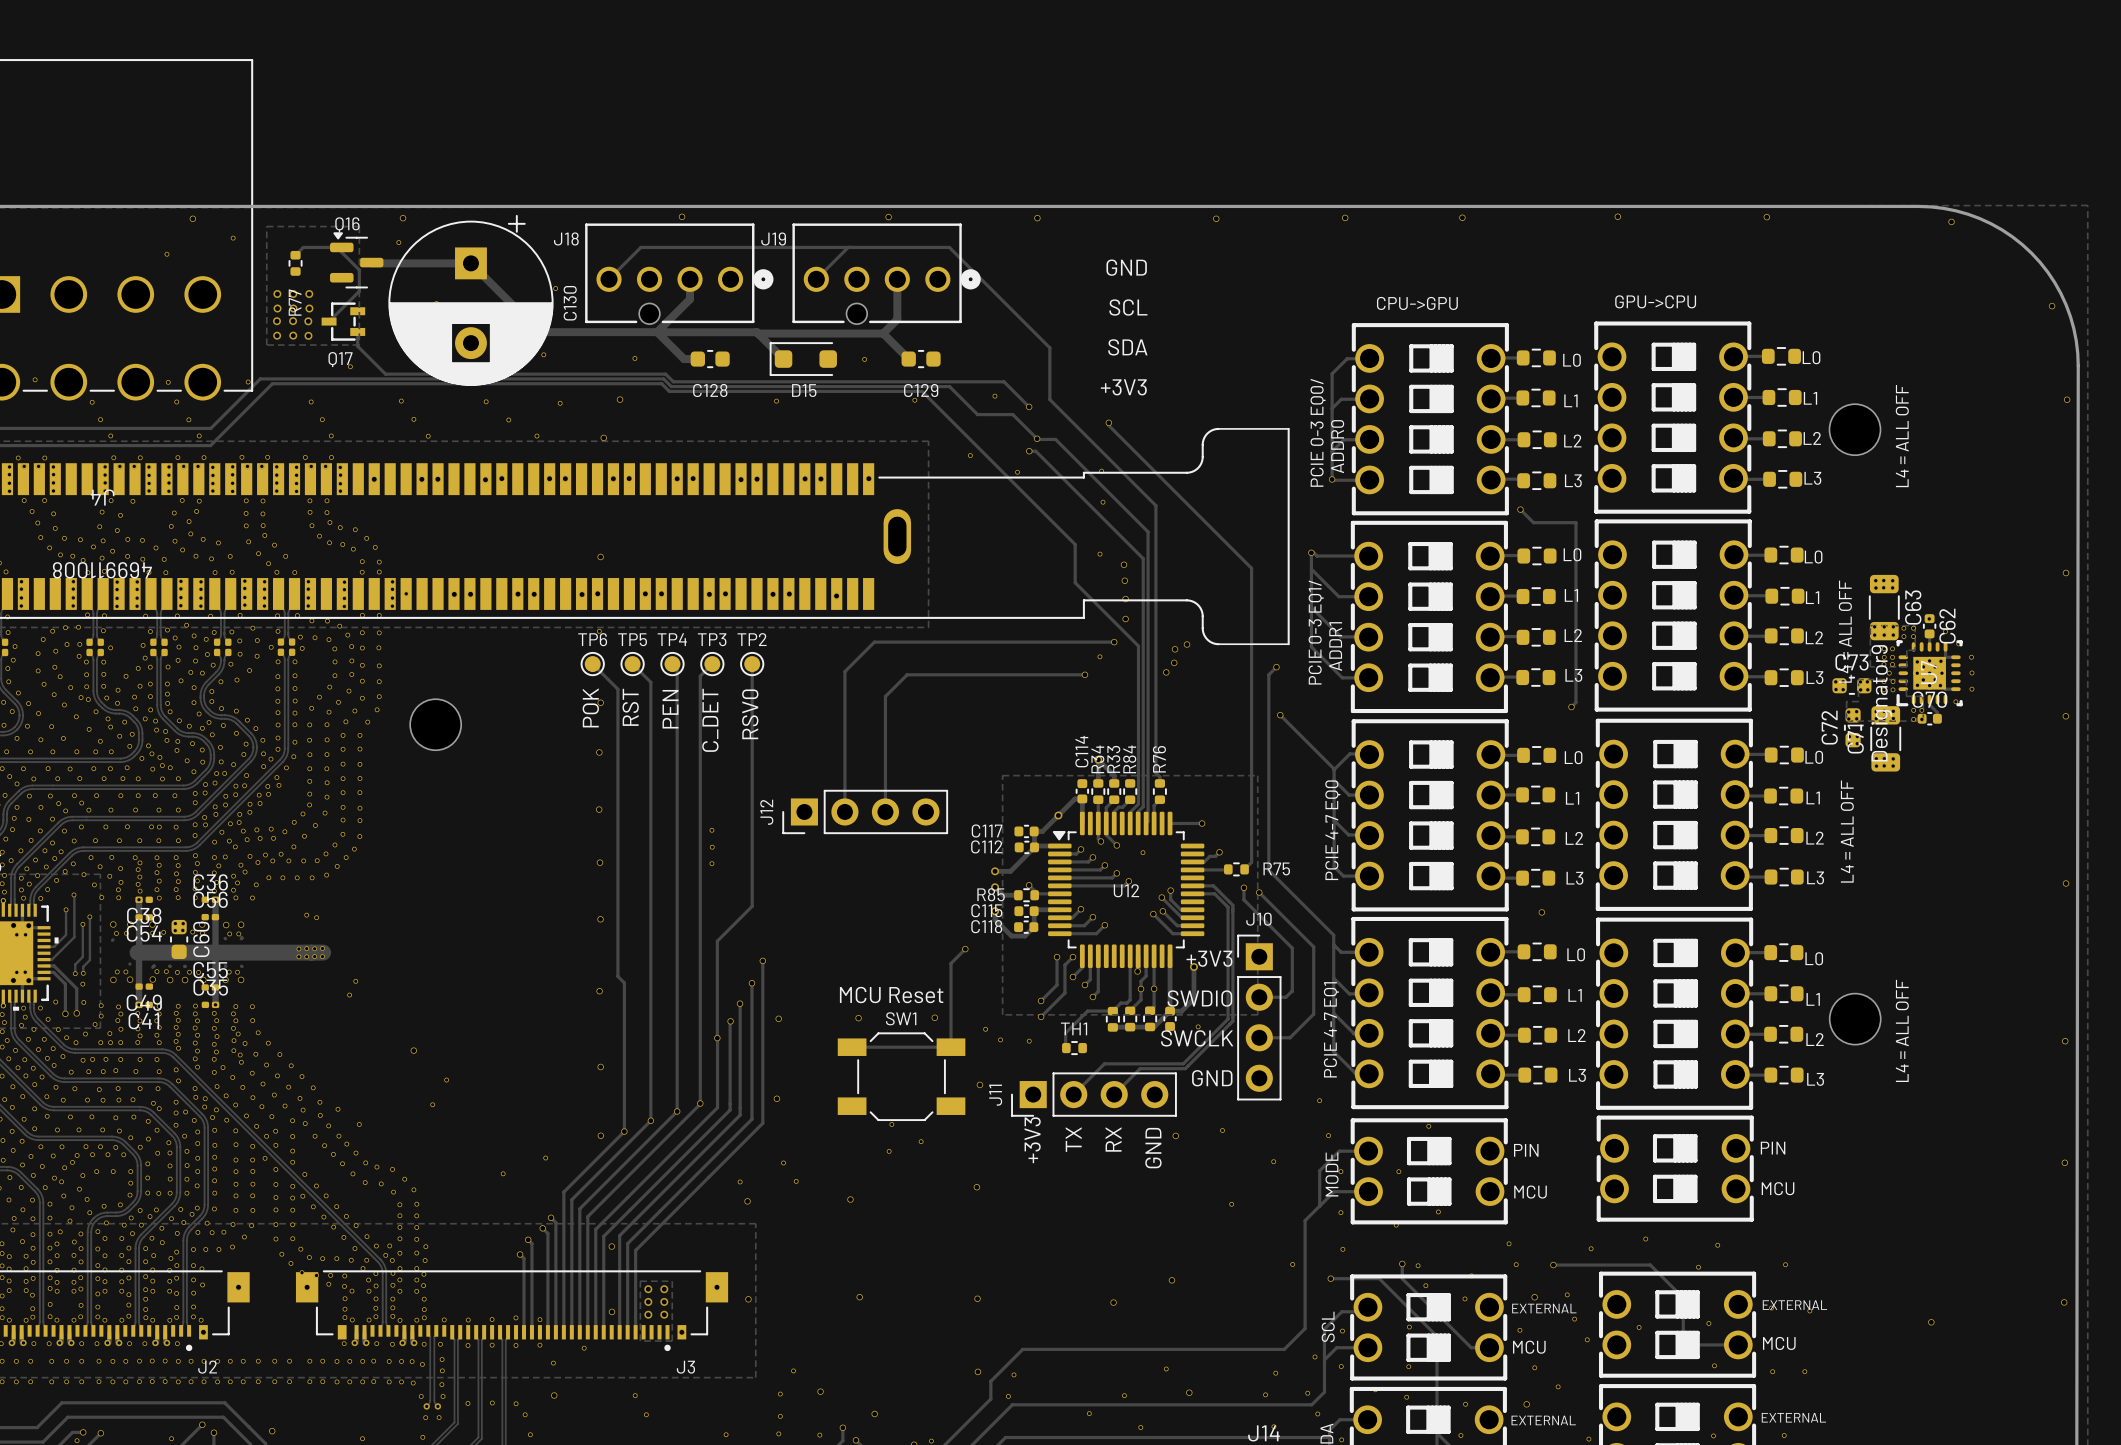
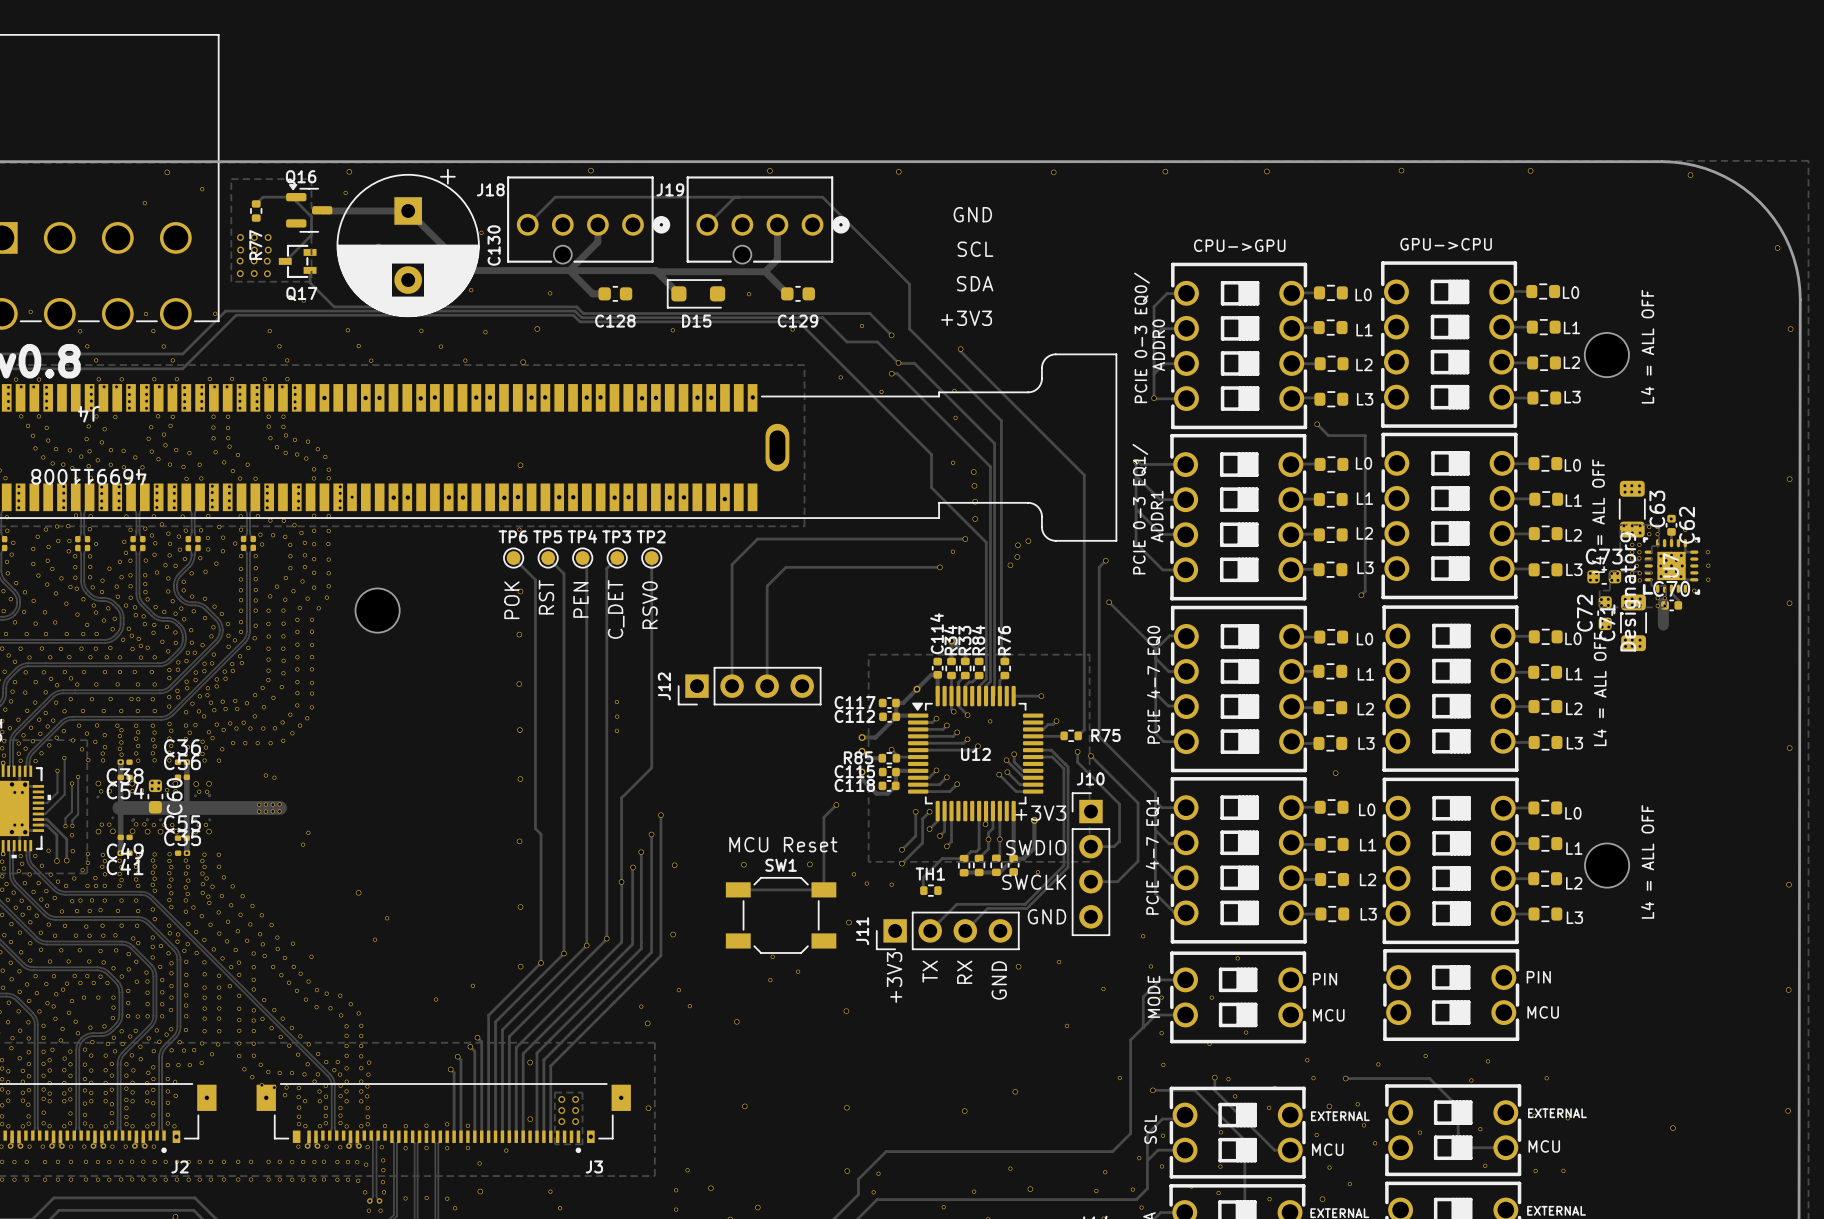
track: none -> (1663, 603) (1663, 625)

